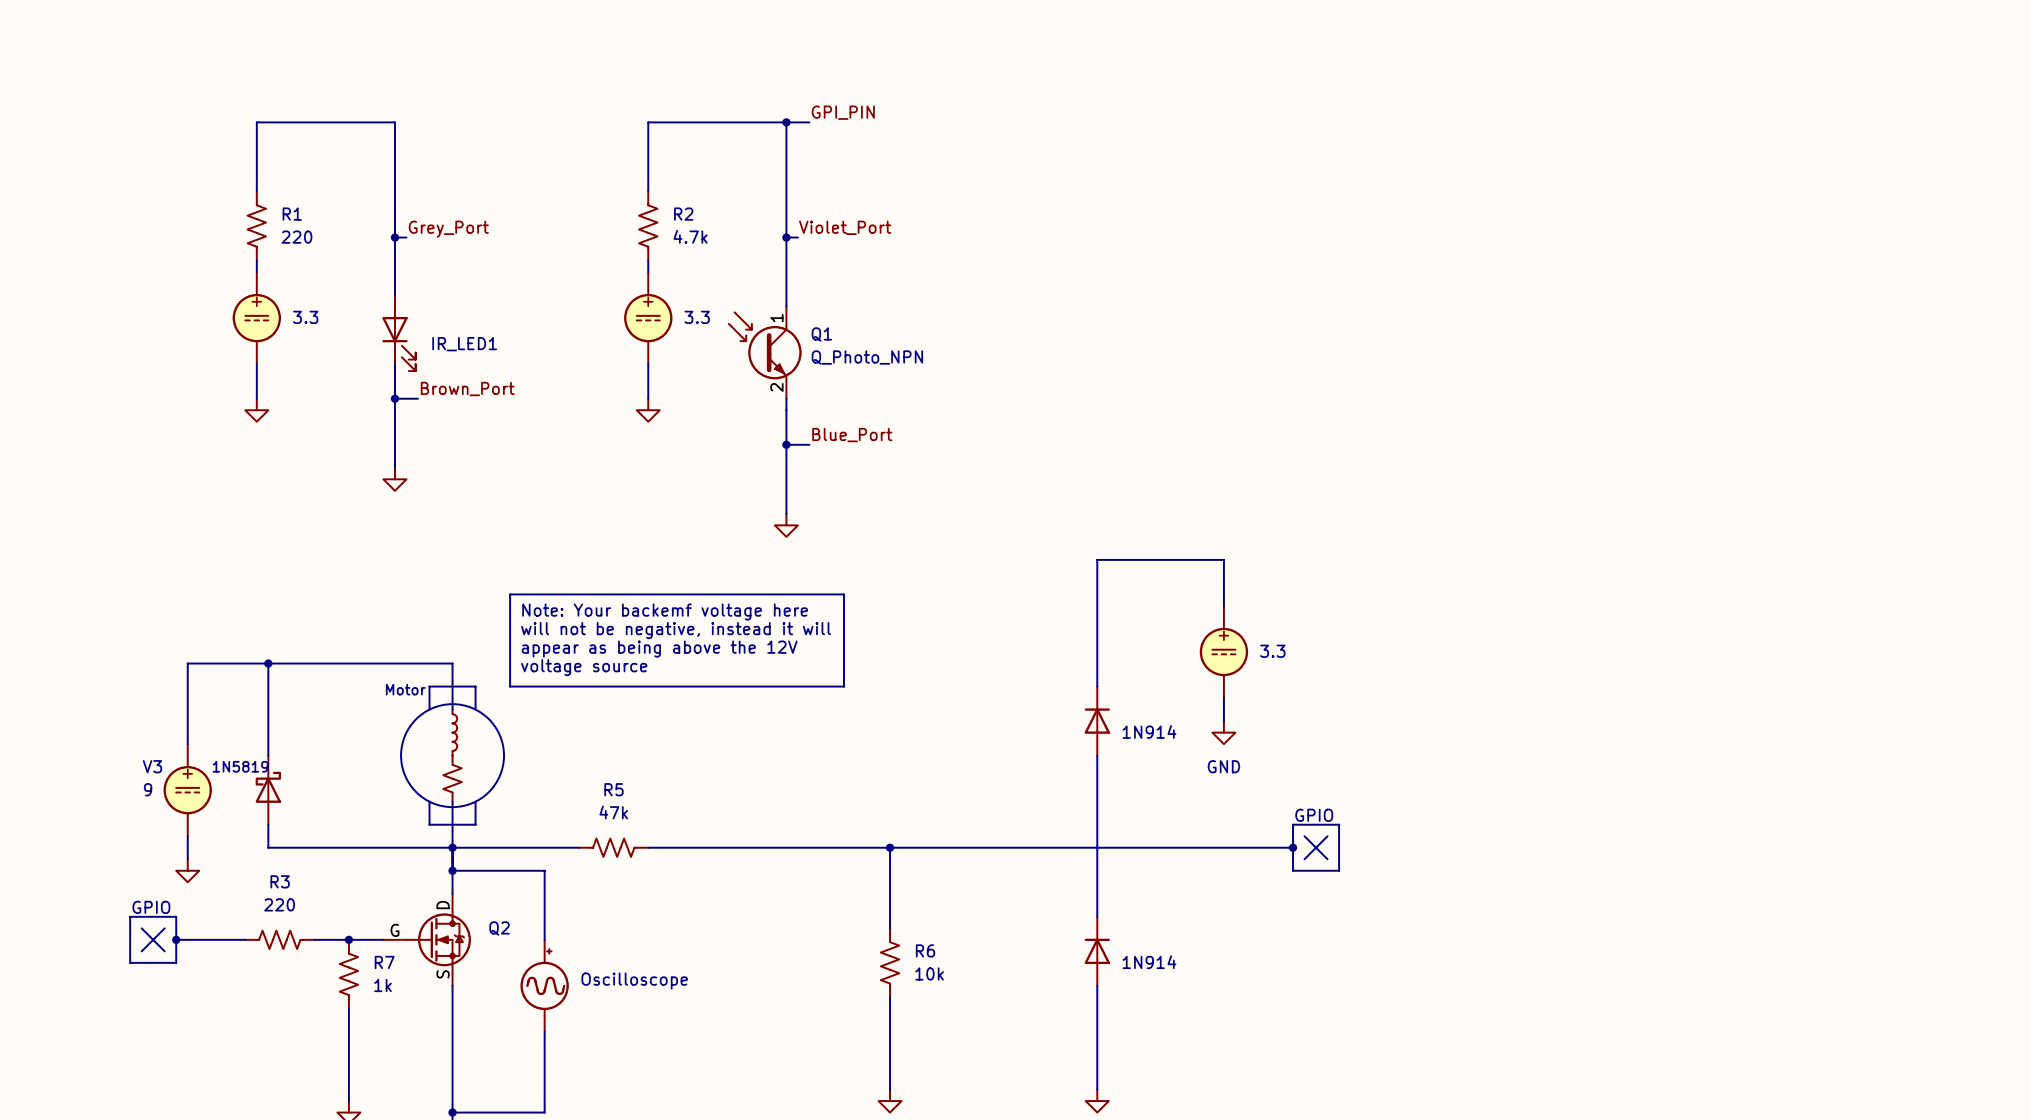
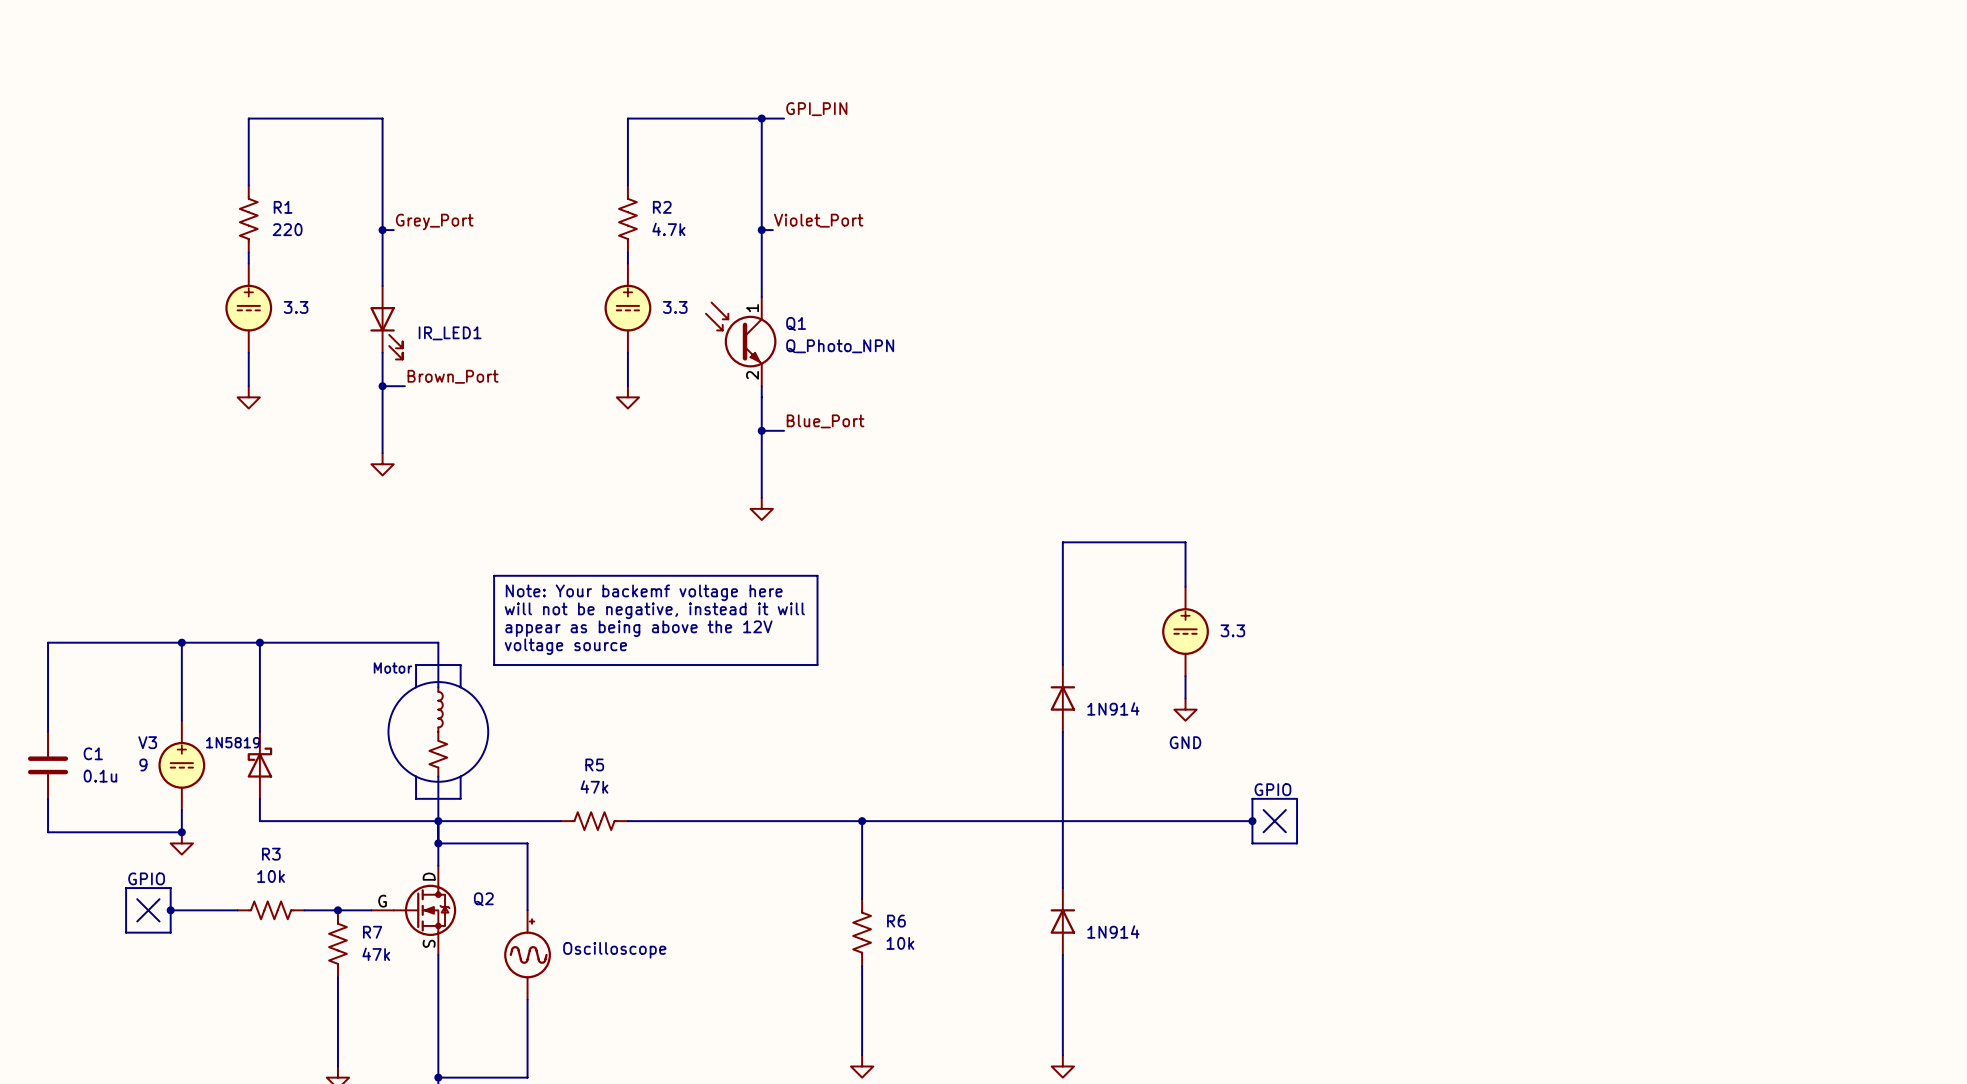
wire: none -> (181, 642) (48, 642) (48, 731)
junction: none -> (181, 642)
C1: none -> 0.1u (48, 765)
wire: none -> (48, 798) (48, 832) (181, 832)
junction: none -> (181, 832)
R3 value: 220 (279, 904) -> 10k (271, 876)
R7 value: 1k (383, 985) -> 47k (376, 954)

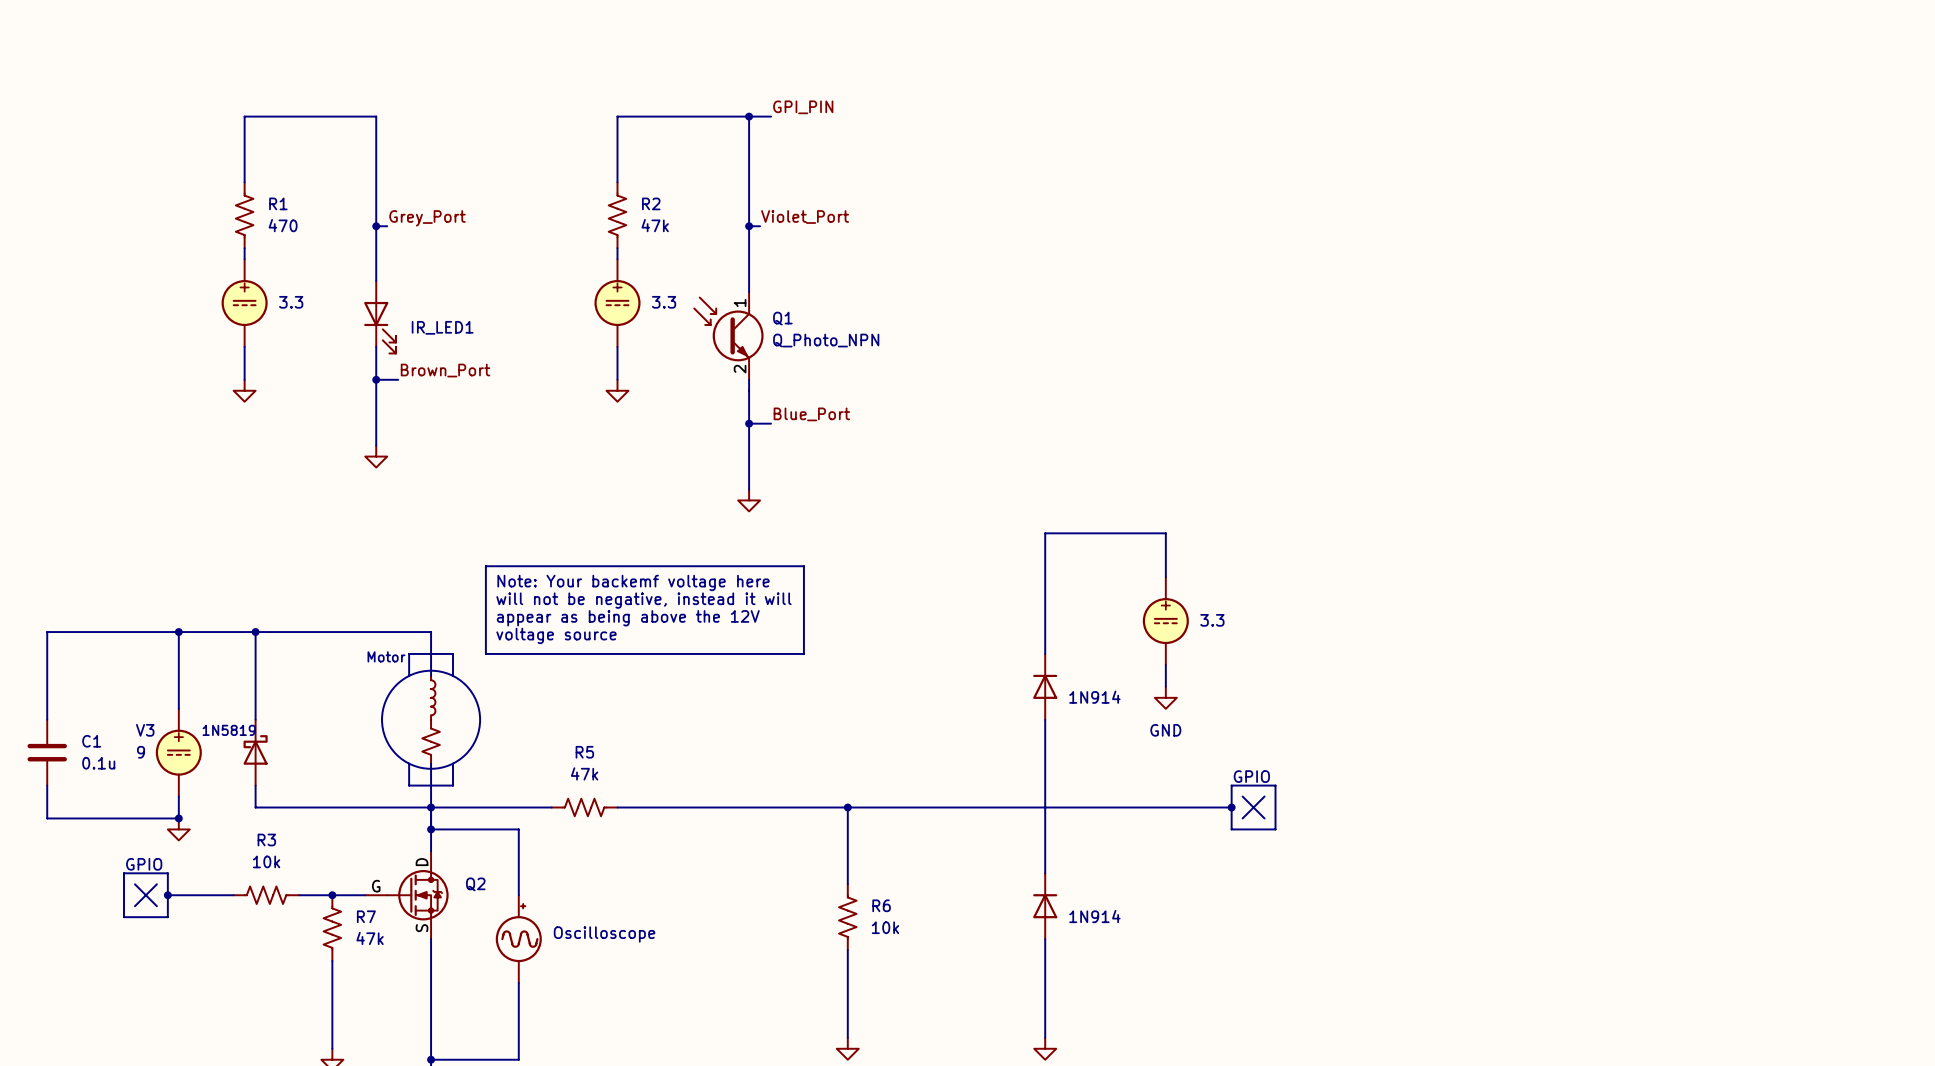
R1 value: 220 (287, 229) -> 470 (283, 225)
R2 value: 4.7k (668, 229) -> 47k (655, 225)

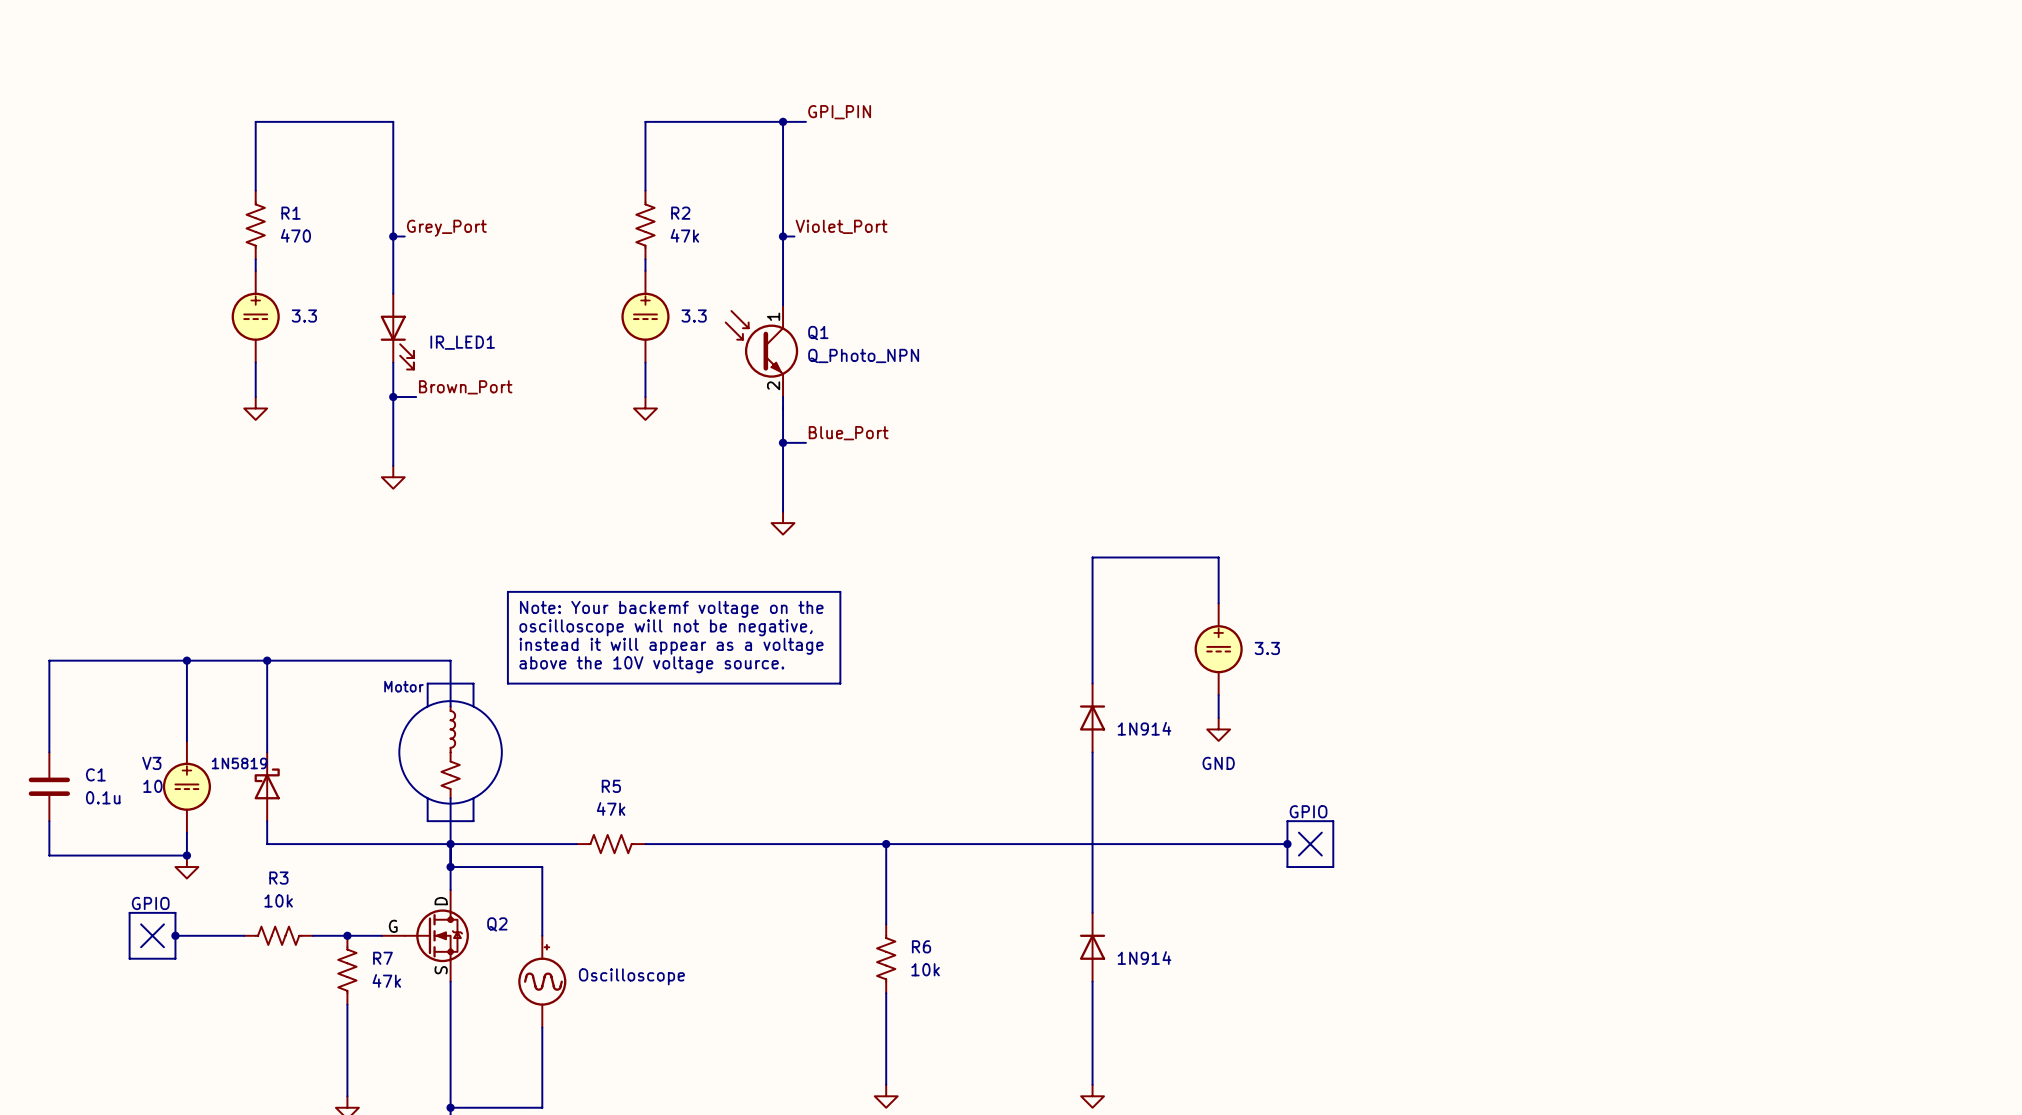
text: Note: Your backemf voltage here (633, 582) -> Note: Your backemf voltage on the (671, 609)
text: will not be negative, instead it will (643, 600) -> oscilloscope will not be negative, (666, 627)
text: appear as being above the 12V (628, 618) -> instead it will appear as a voltage (671, 646)
text: voltage source (556, 635) -> above the 10V voltage source. (651, 664)
V3 value: 9 (141, 752) -> 10 (152, 786)

